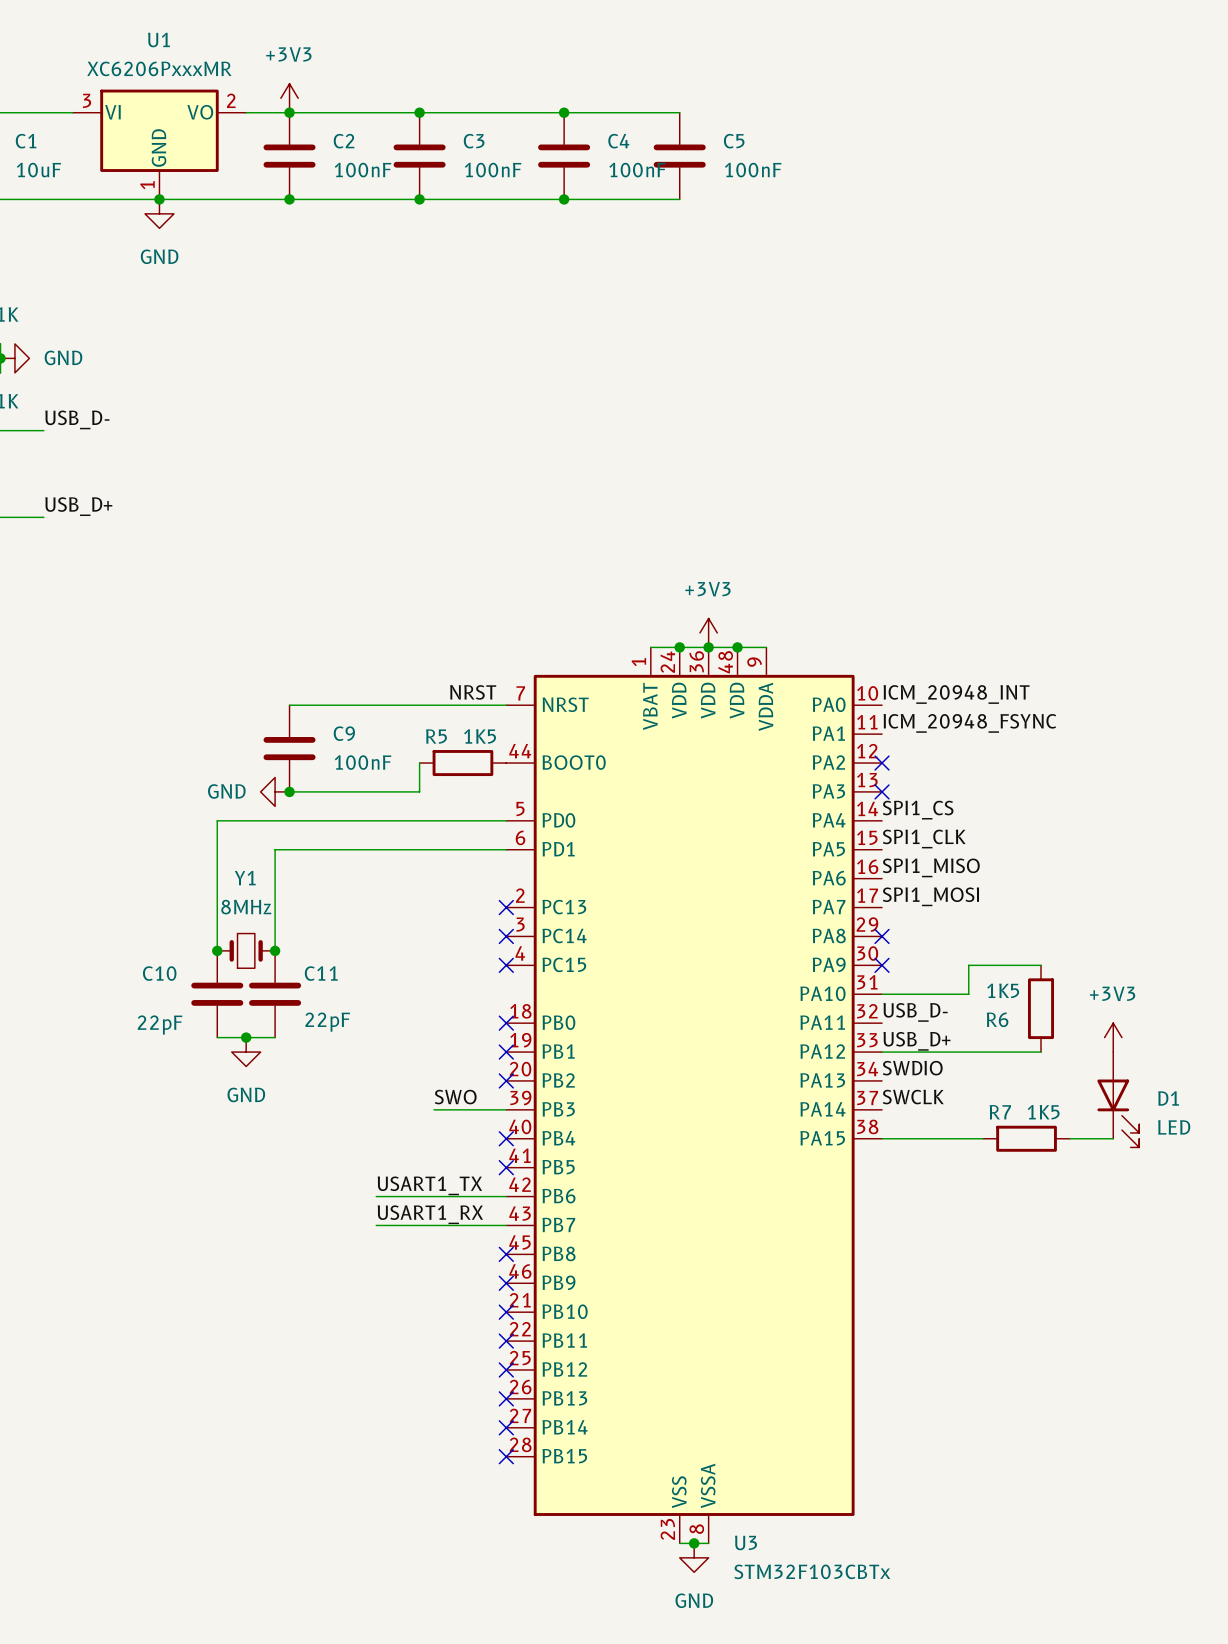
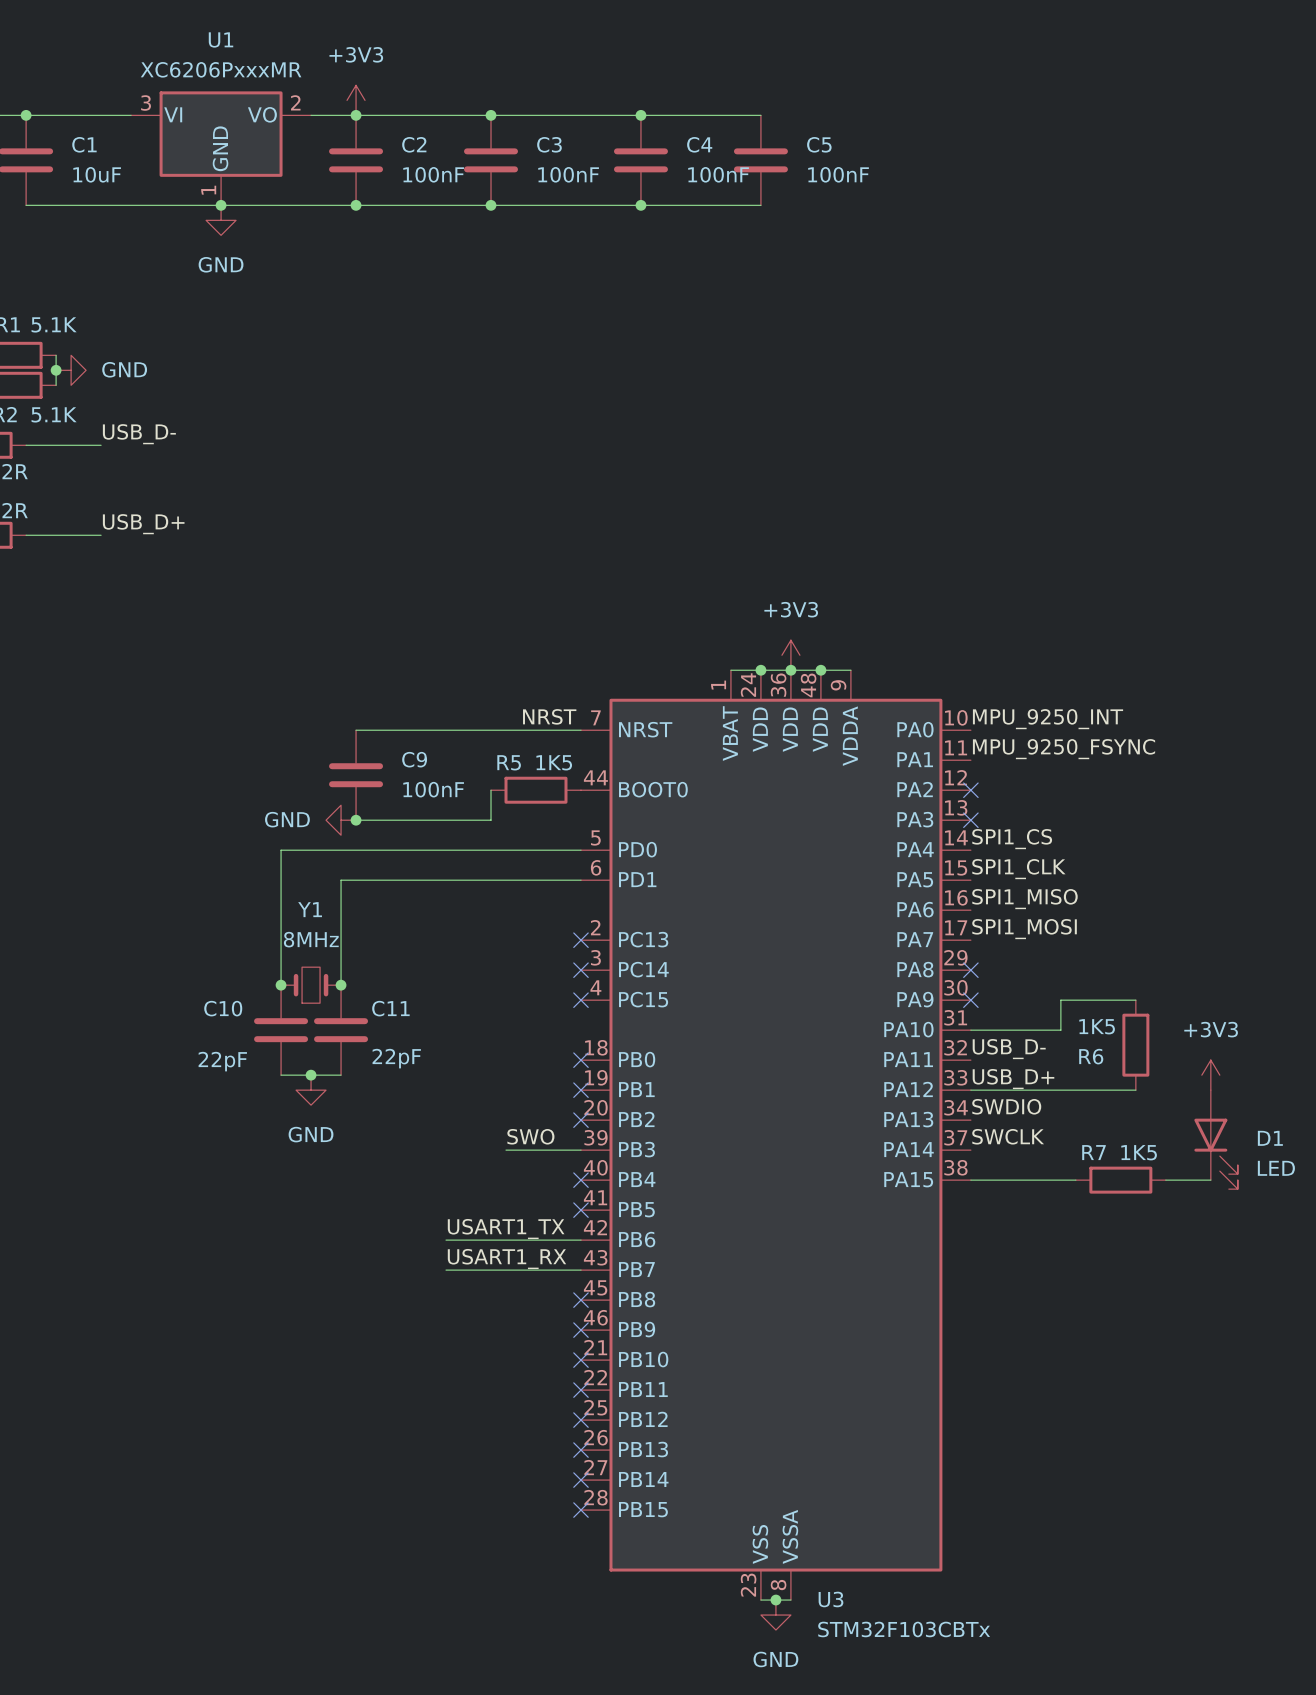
label: ICM_20948_INT (956, 694) -> MPU_9250_INT (1048, 719)
label: ICM_20948_FSYNC (969, 723) -> MPU_9250_FSYNC (1064, 749)

